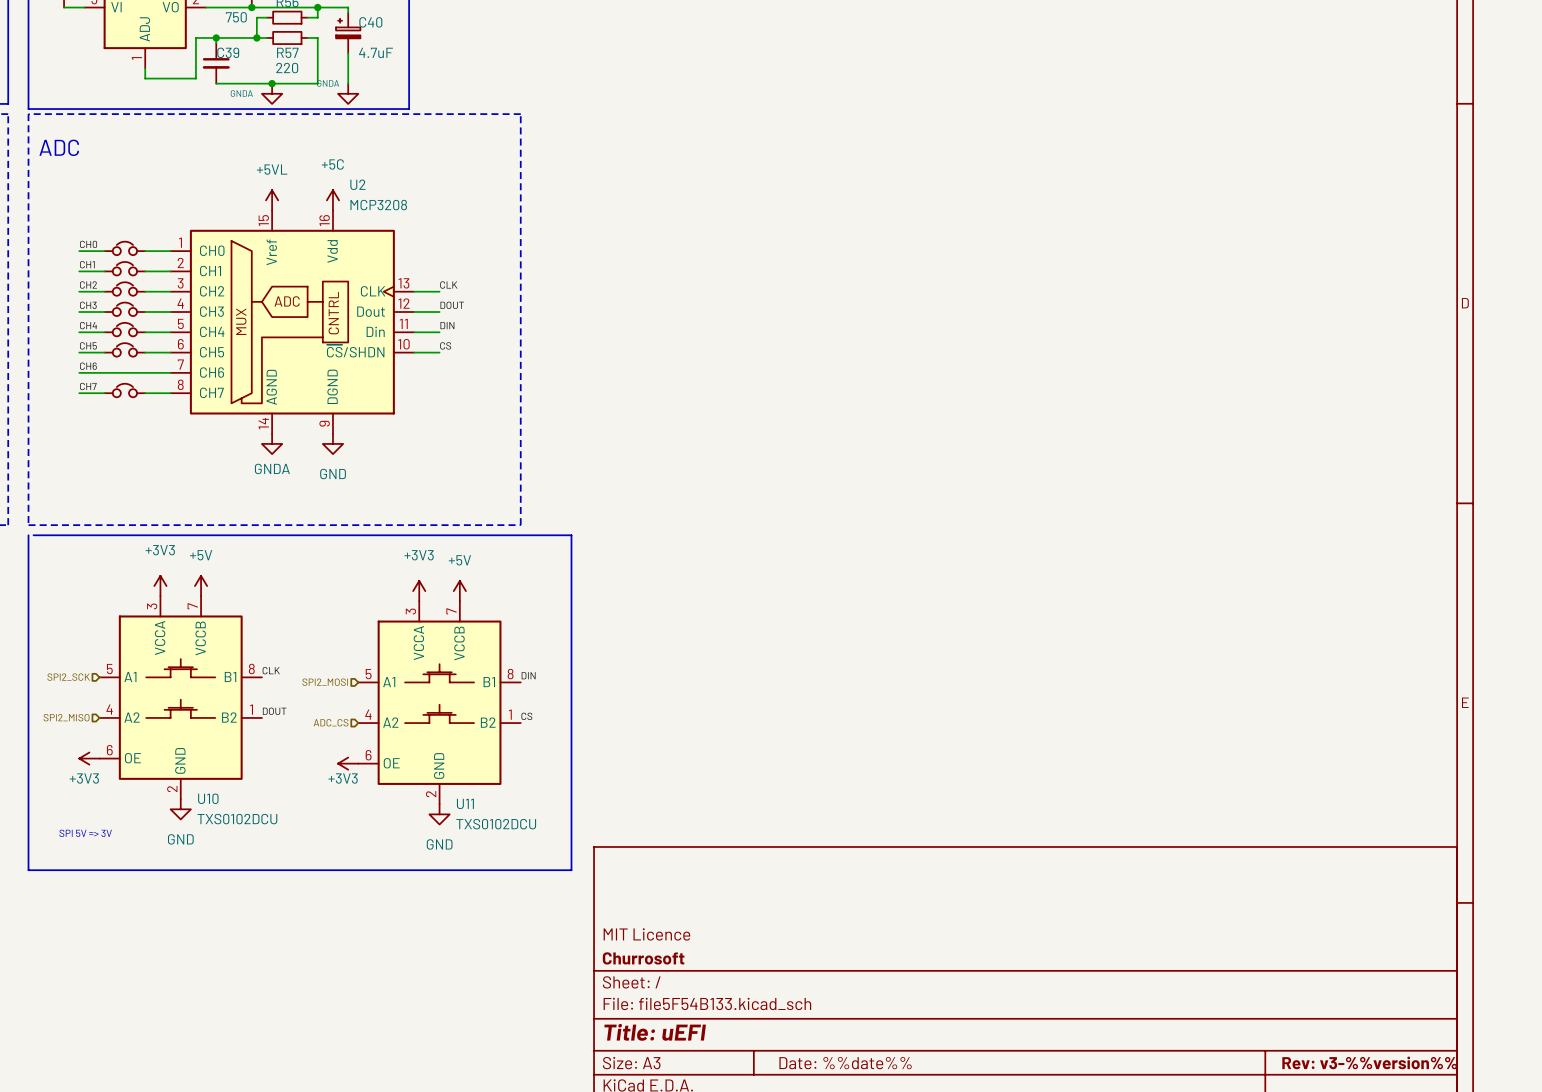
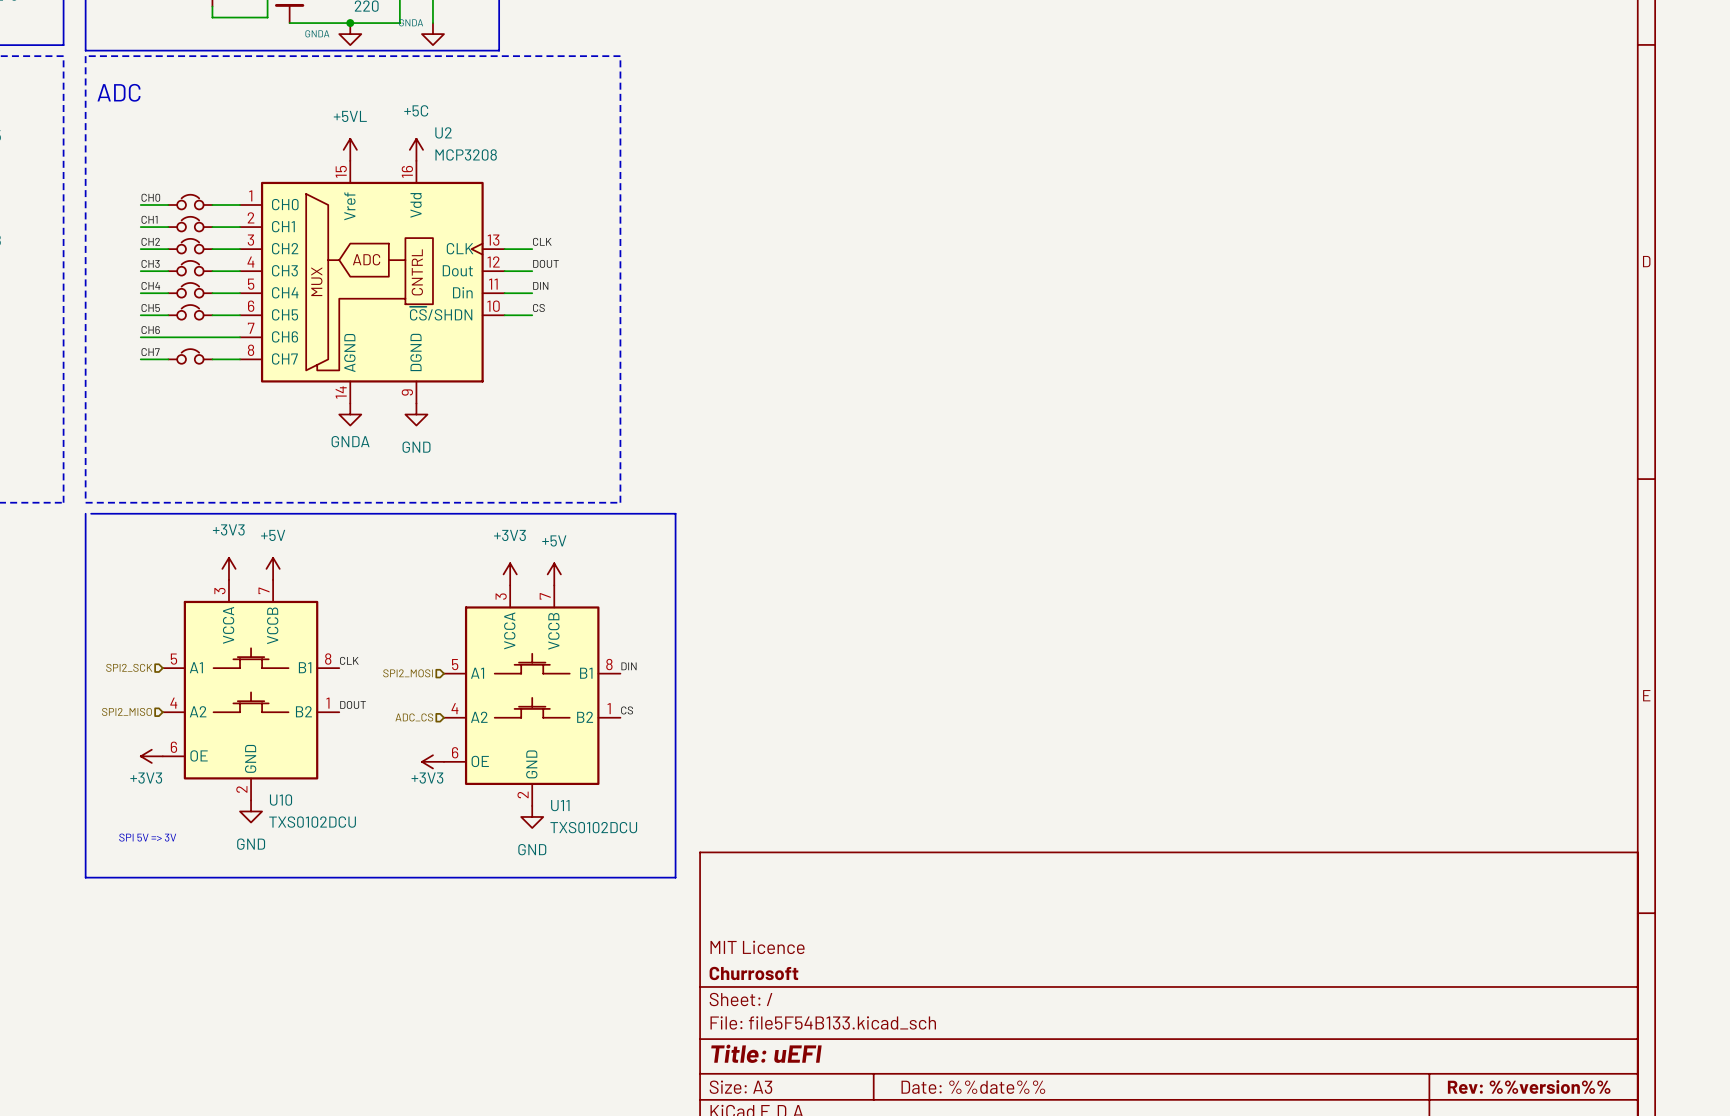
title block: Rev: v3-%%version%% (1369, 1062) -> Rev: %%version%% (1529, 1087)

